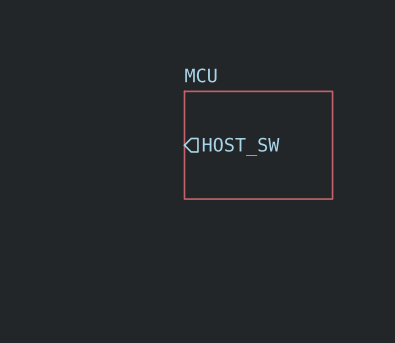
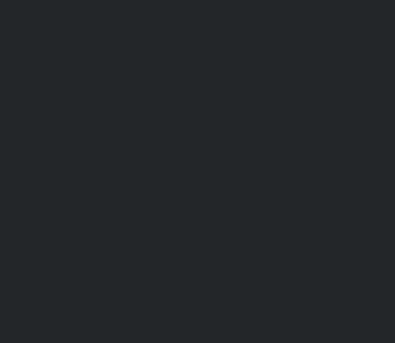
sheet MCU: (258, 145) -> none
sheet pin: HOST_SW (241, 146) -> none

